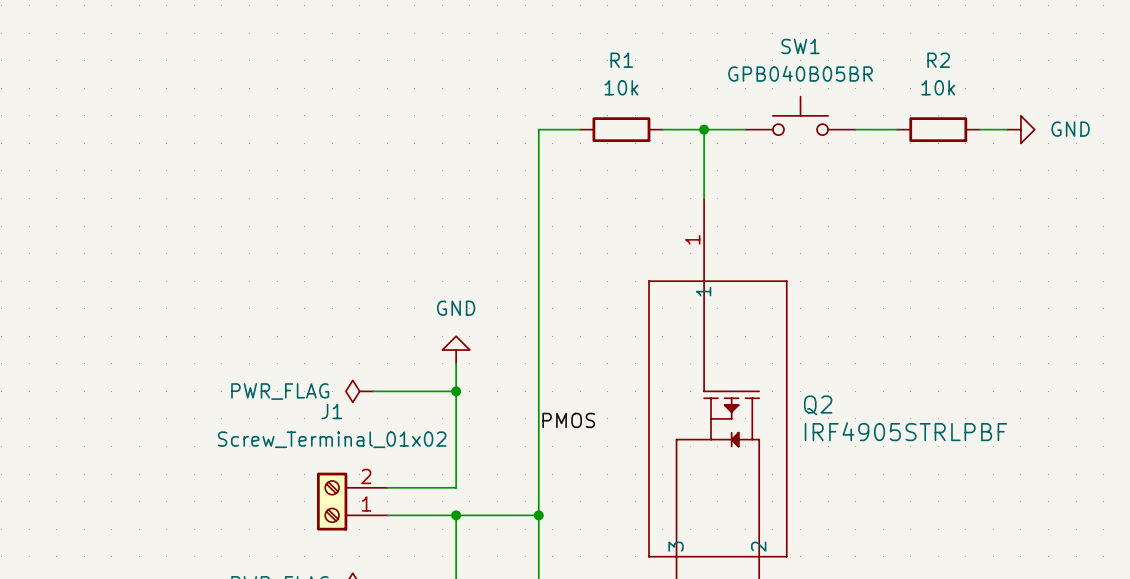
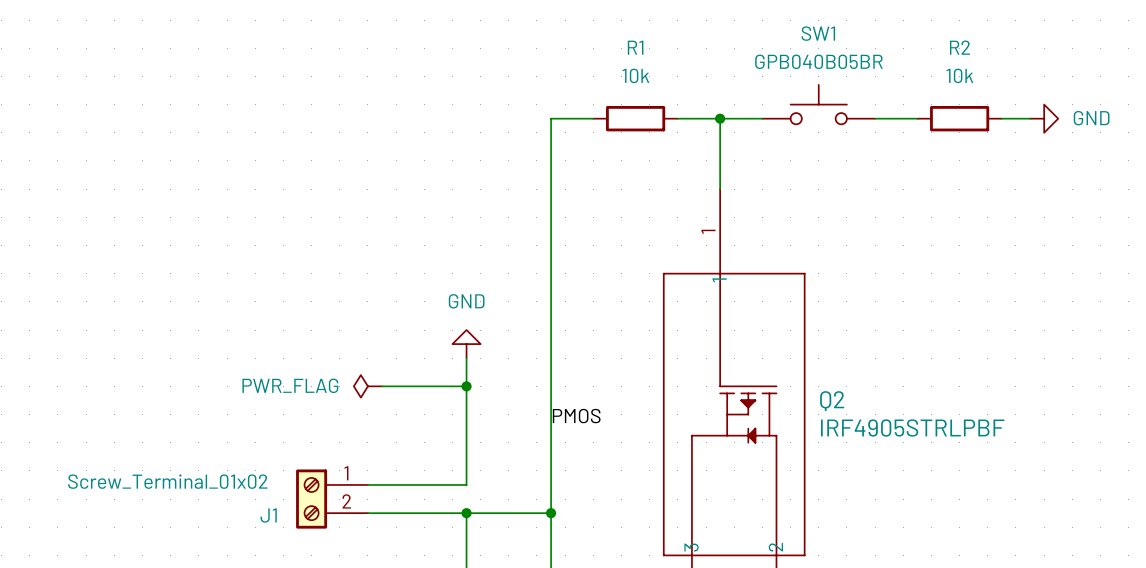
J1 name position: J1 (331, 411) -> J1 (268, 515)
J1 value position: Screw_Terminal_01x02 (332, 439) -> Screw_Terminal_01x02 (167, 481)
J1 flip: as is (332, 501) -> up-down (311, 499)

